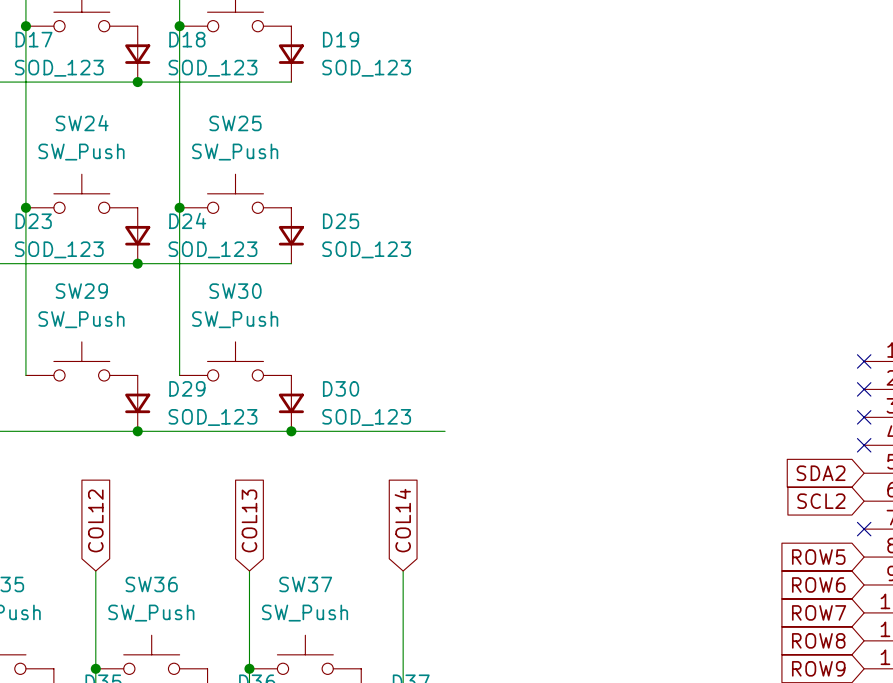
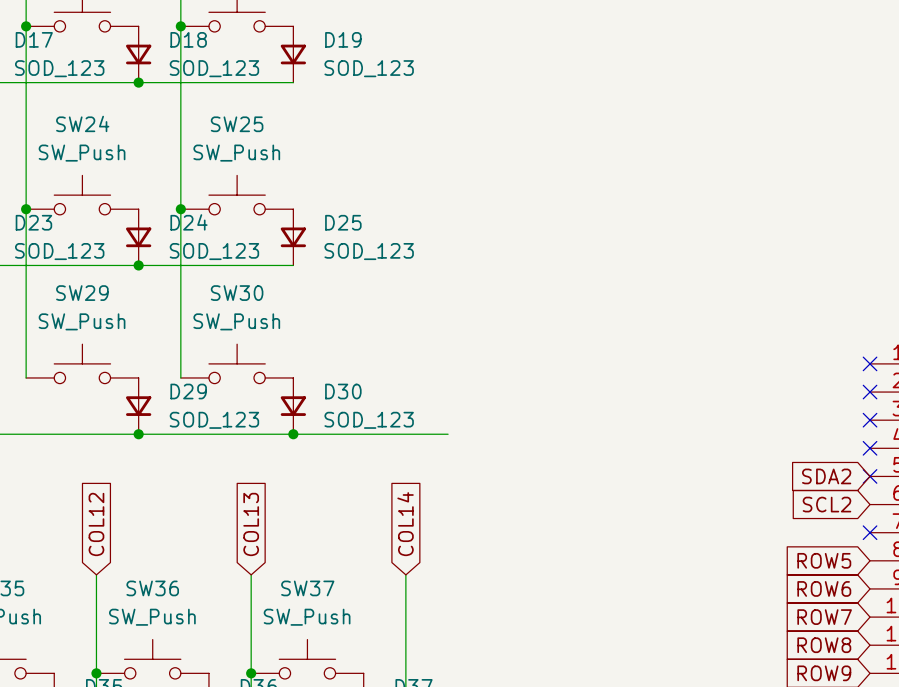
no-connect mark: none -> (870, 476)

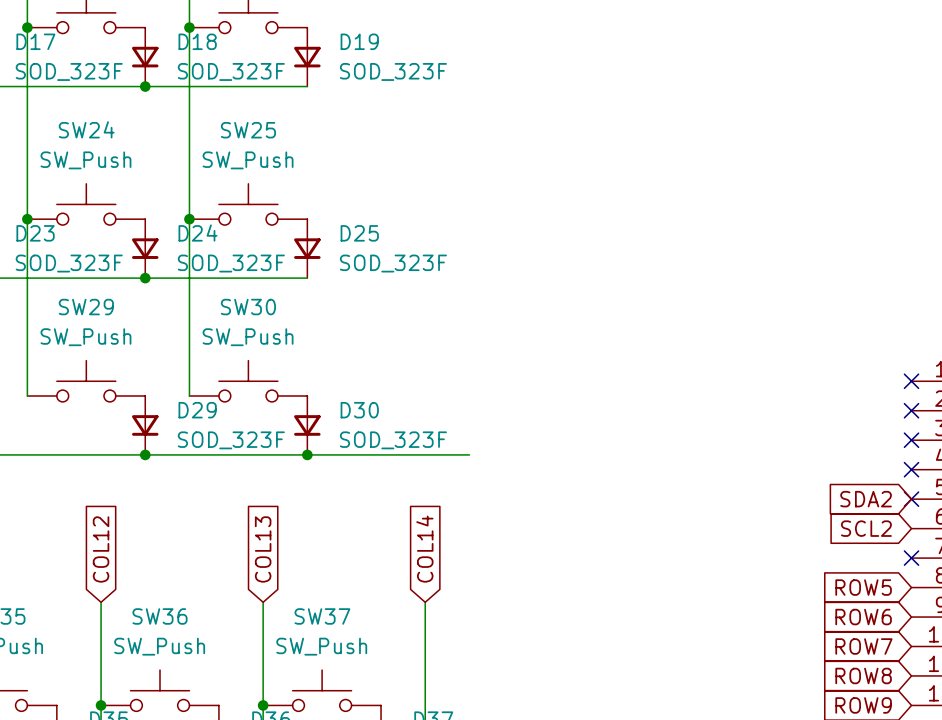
D17 value: SOD_123 (59, 68) -> SOD_323F (69, 71)
D18 value: SOD_123 (214, 68) -> SOD_323F (231, 71)
D19 value: SOD_123 (369, 68) -> SOD_323F (393, 71)
D23 value: SOD_123 (59, 251) -> SOD_323F (69, 263)
D24 value: SOD_123 (214, 251) -> SOD_323F (231, 263)
D25 value: SOD_123 (369, 251) -> SOD_323F (393, 263)
D29 value: SOD_123 (214, 420) -> SOD_323F (231, 440)
D30 value: SOD_123 (369, 420) -> SOD_323F (393, 440)

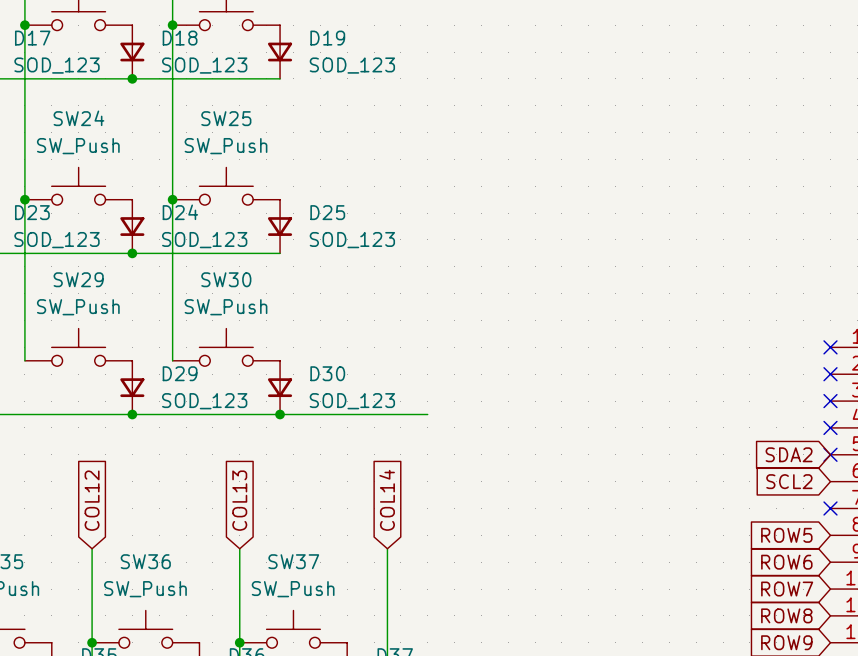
D17 value: SOD_323F (69, 71) -> SOD_123 (57, 65)
D18 value: SOD_323F (231, 71) -> SOD_123 (204, 65)
D19 value: SOD_323F (393, 71) -> SOD_123 (352, 65)
D23 value: SOD_323F (69, 263) -> SOD_123 (57, 240)
D24 value: SOD_323F (231, 263) -> SOD_123 (204, 240)
D25 value: SOD_323F (393, 263) -> SOD_123 (352, 240)
D29 value: SOD_323F (231, 440) -> SOD_123 (204, 401)
D30 value: SOD_323F (393, 440) -> SOD_123 (352, 401)

